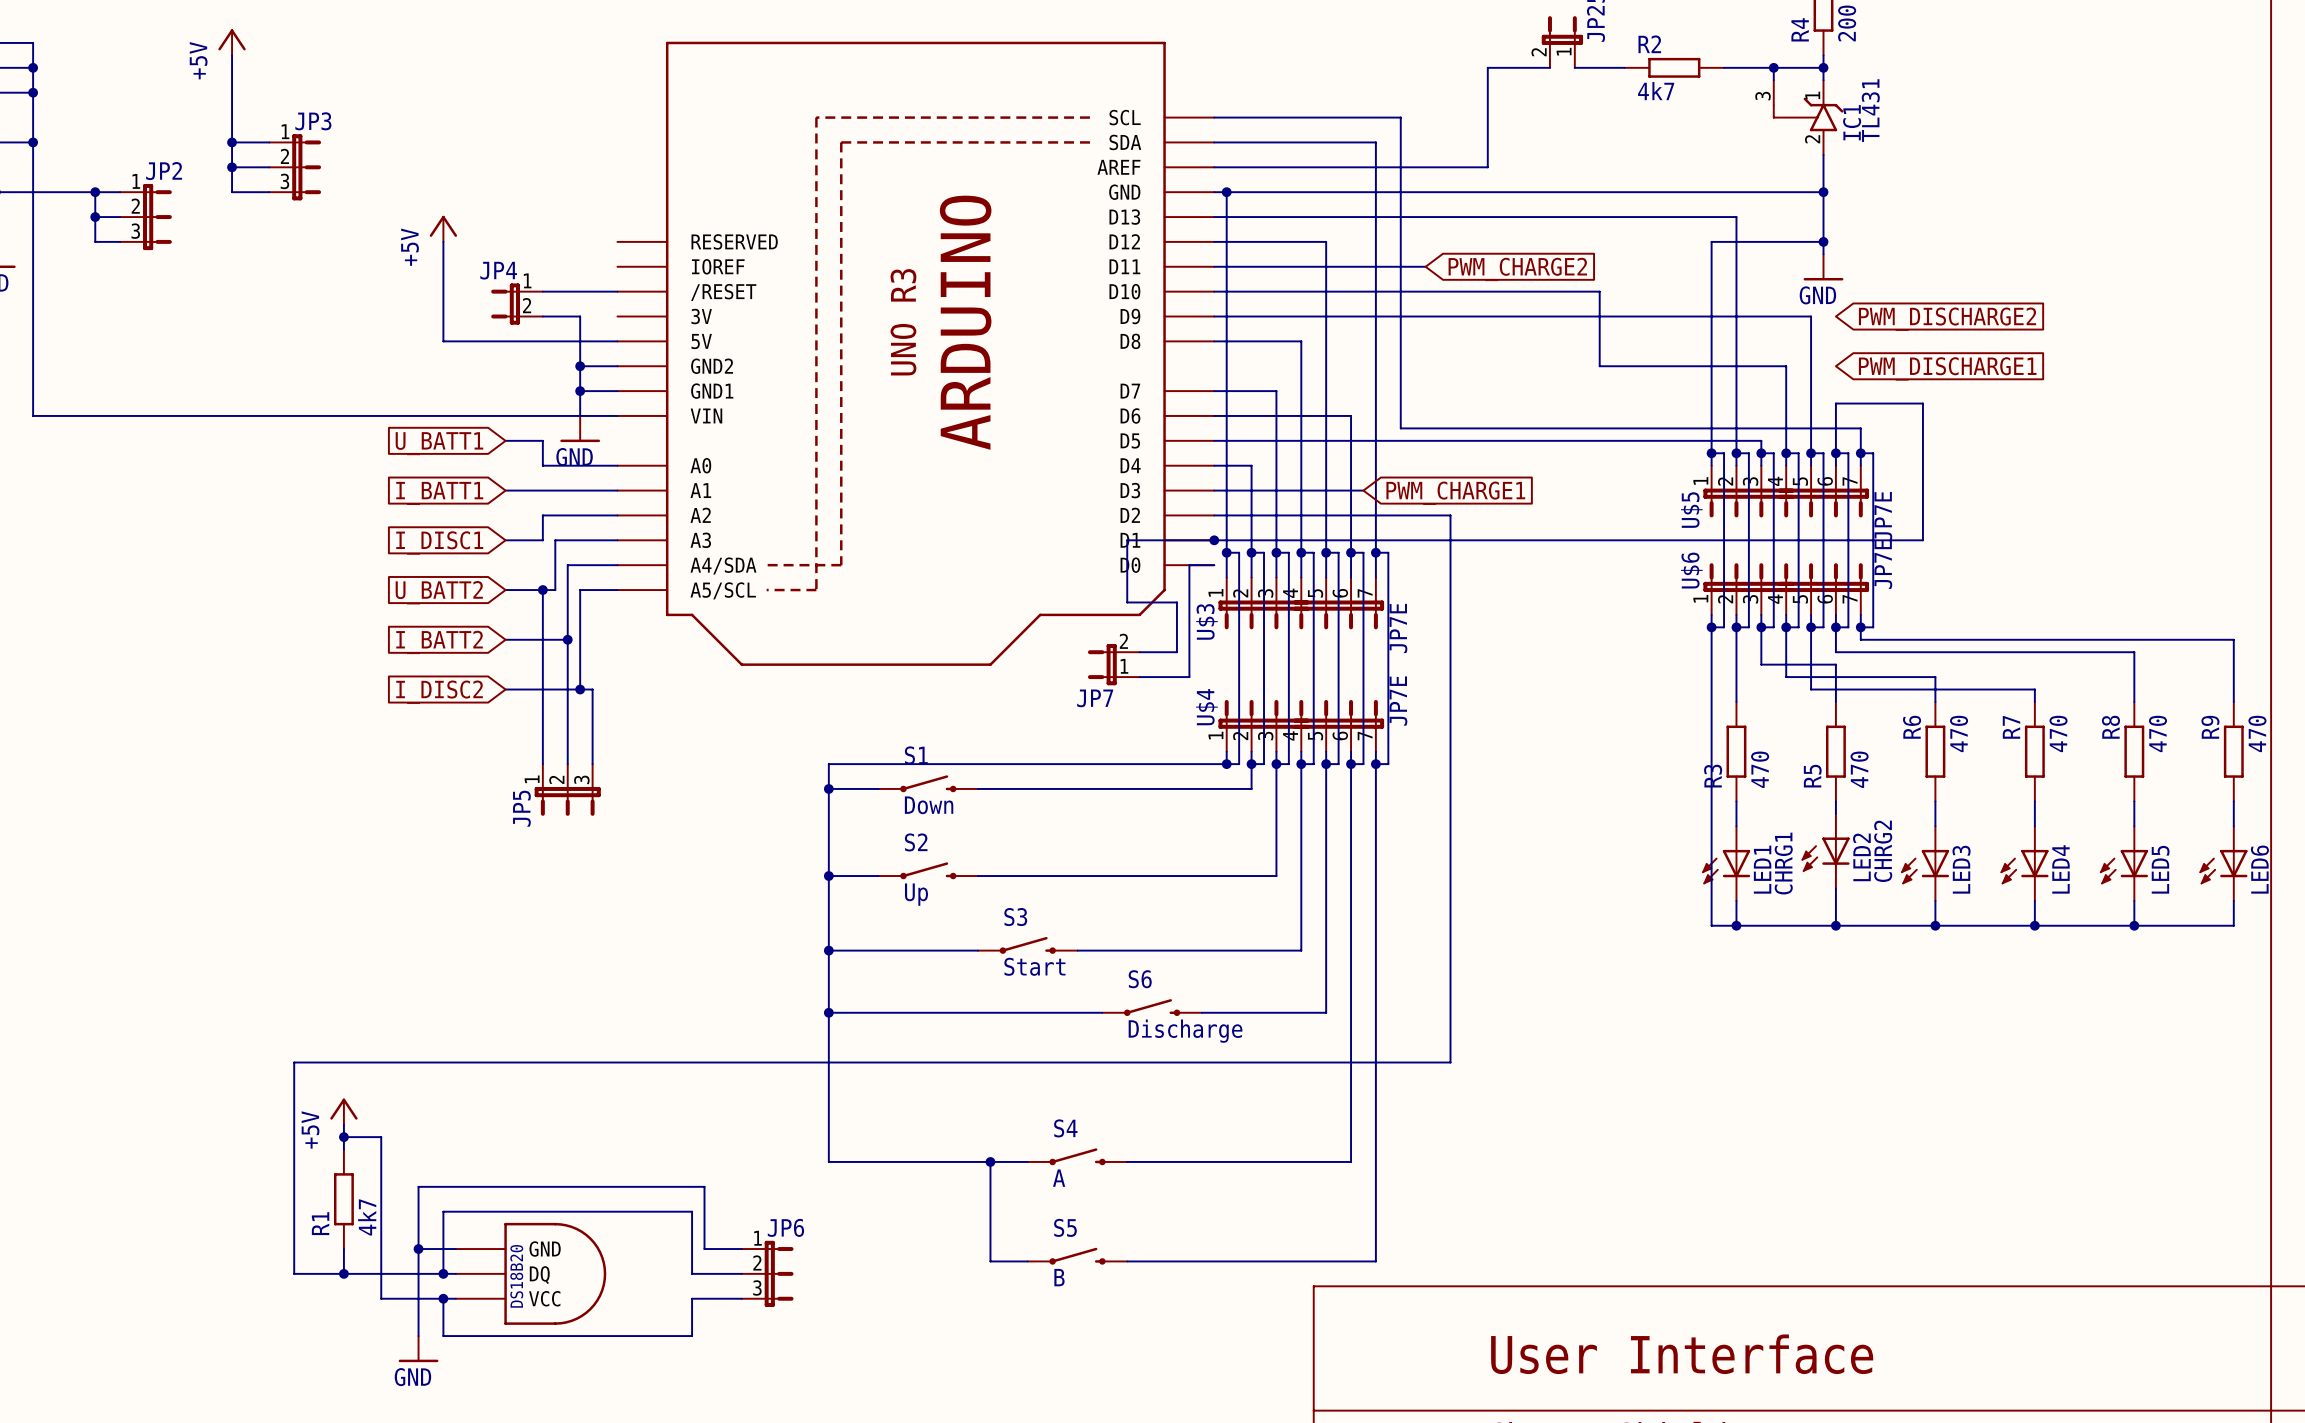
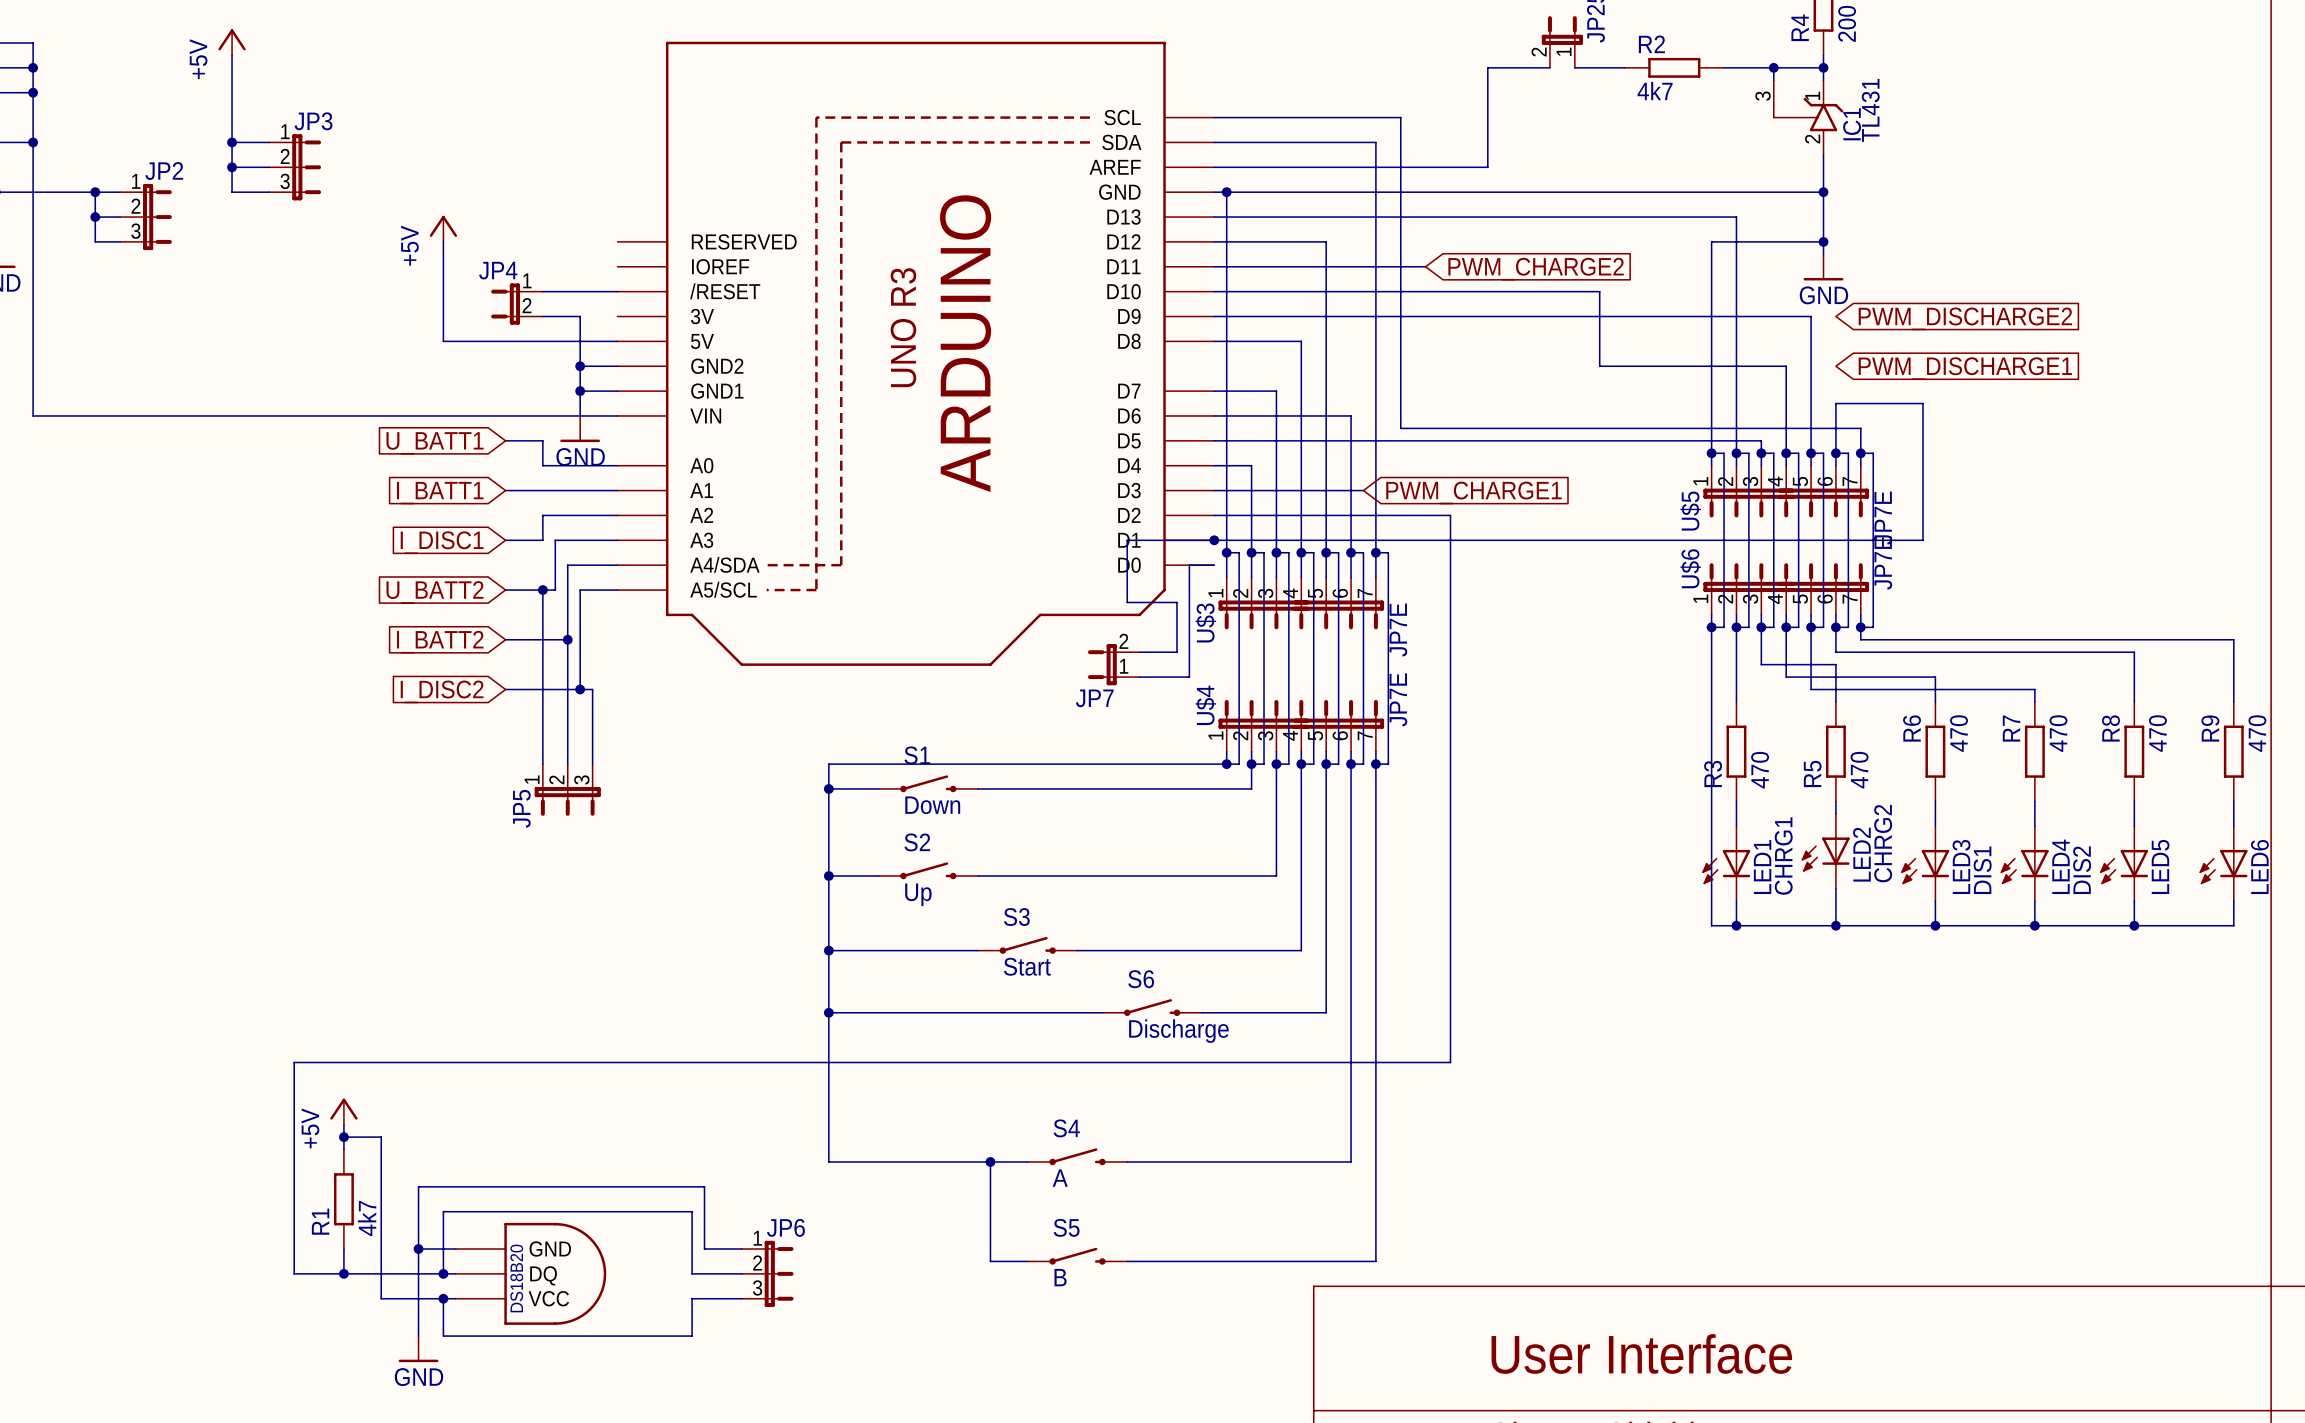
LED3 value: none -> DIS1 (1982, 870)
LED4 value: none -> DIS2 (2082, 870)

